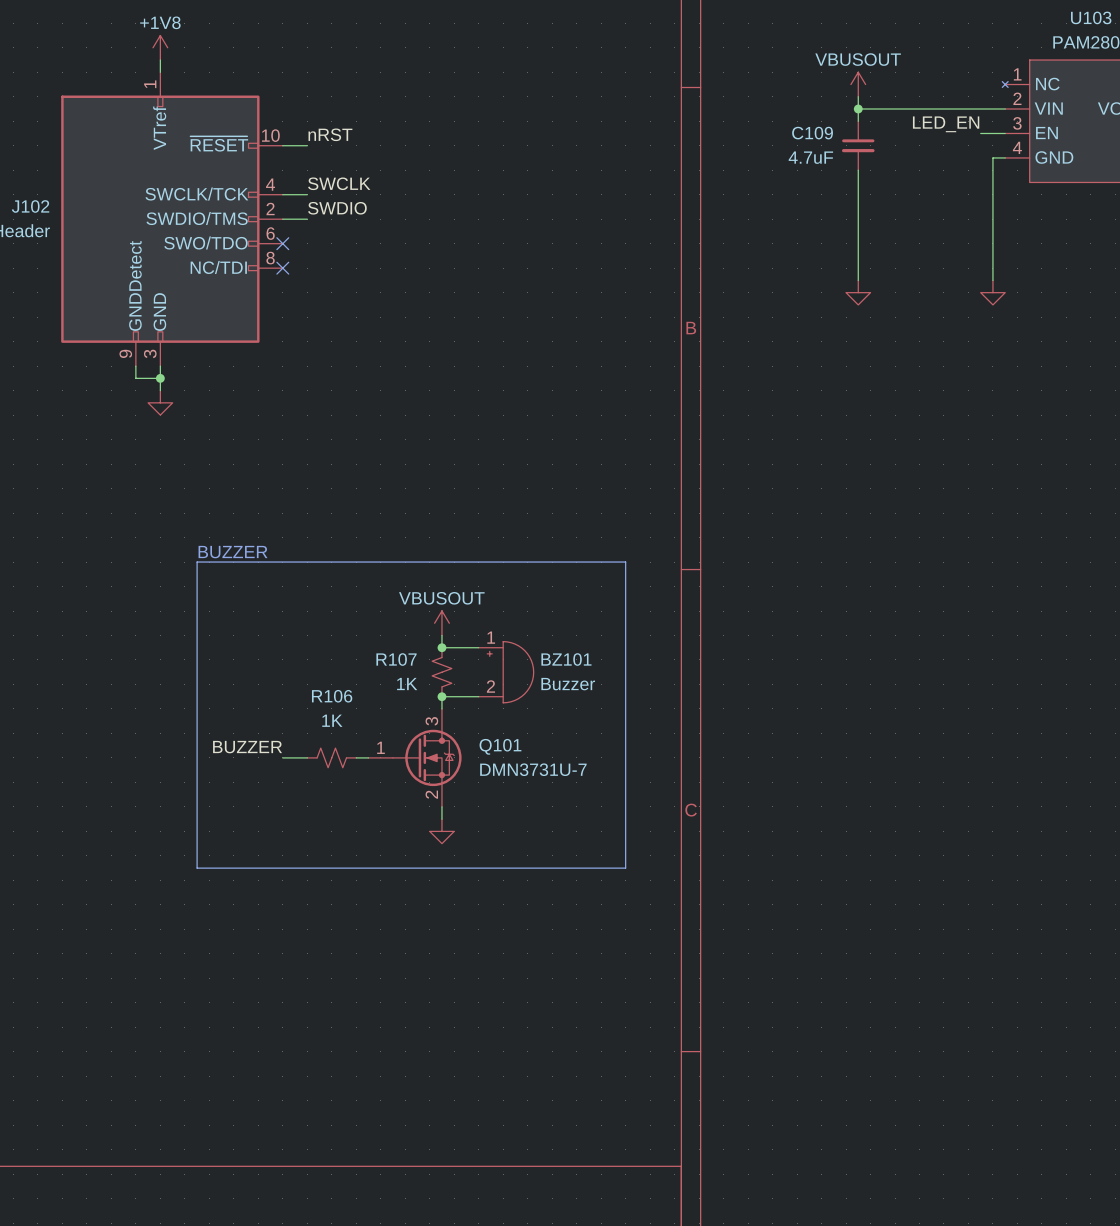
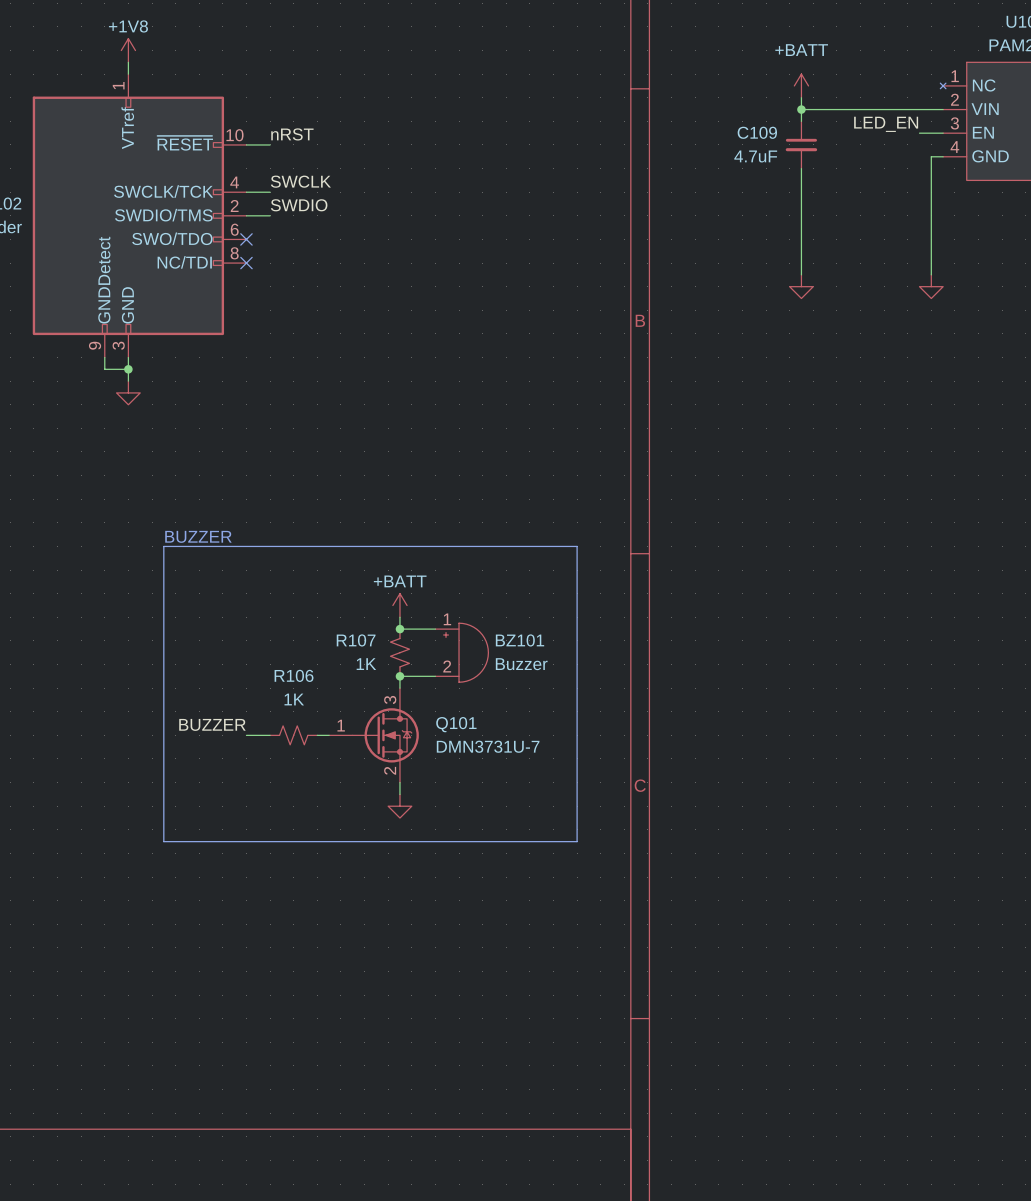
power symbol: VBUSOUT (858, 84) -> +BATT (801, 85)
power symbol: VBUSOUT (441, 623) -> +BATT (399, 605)

